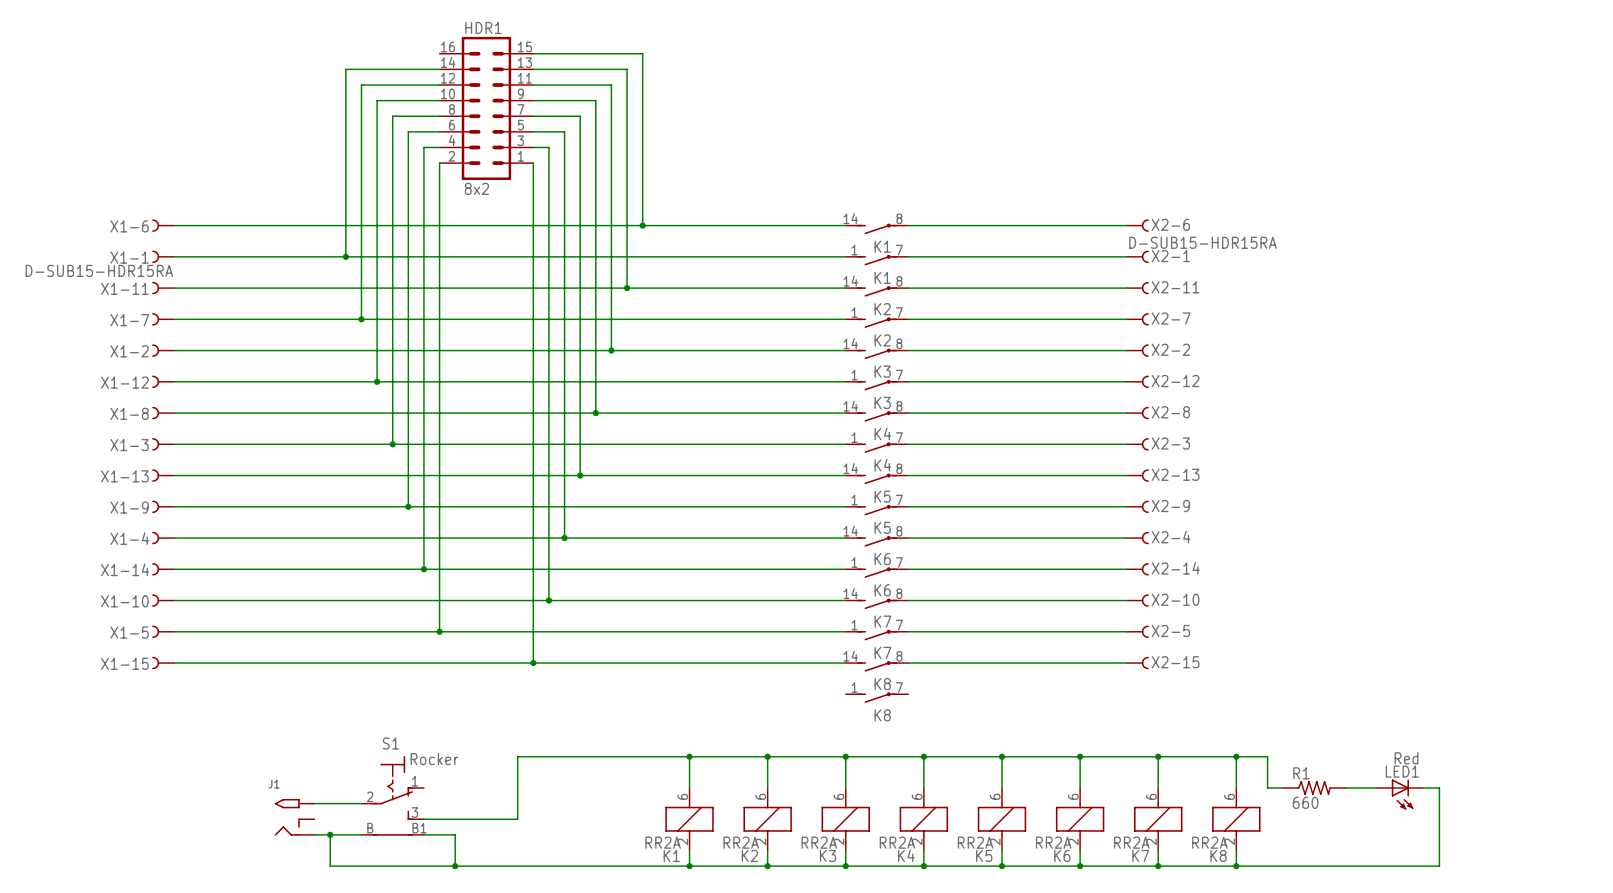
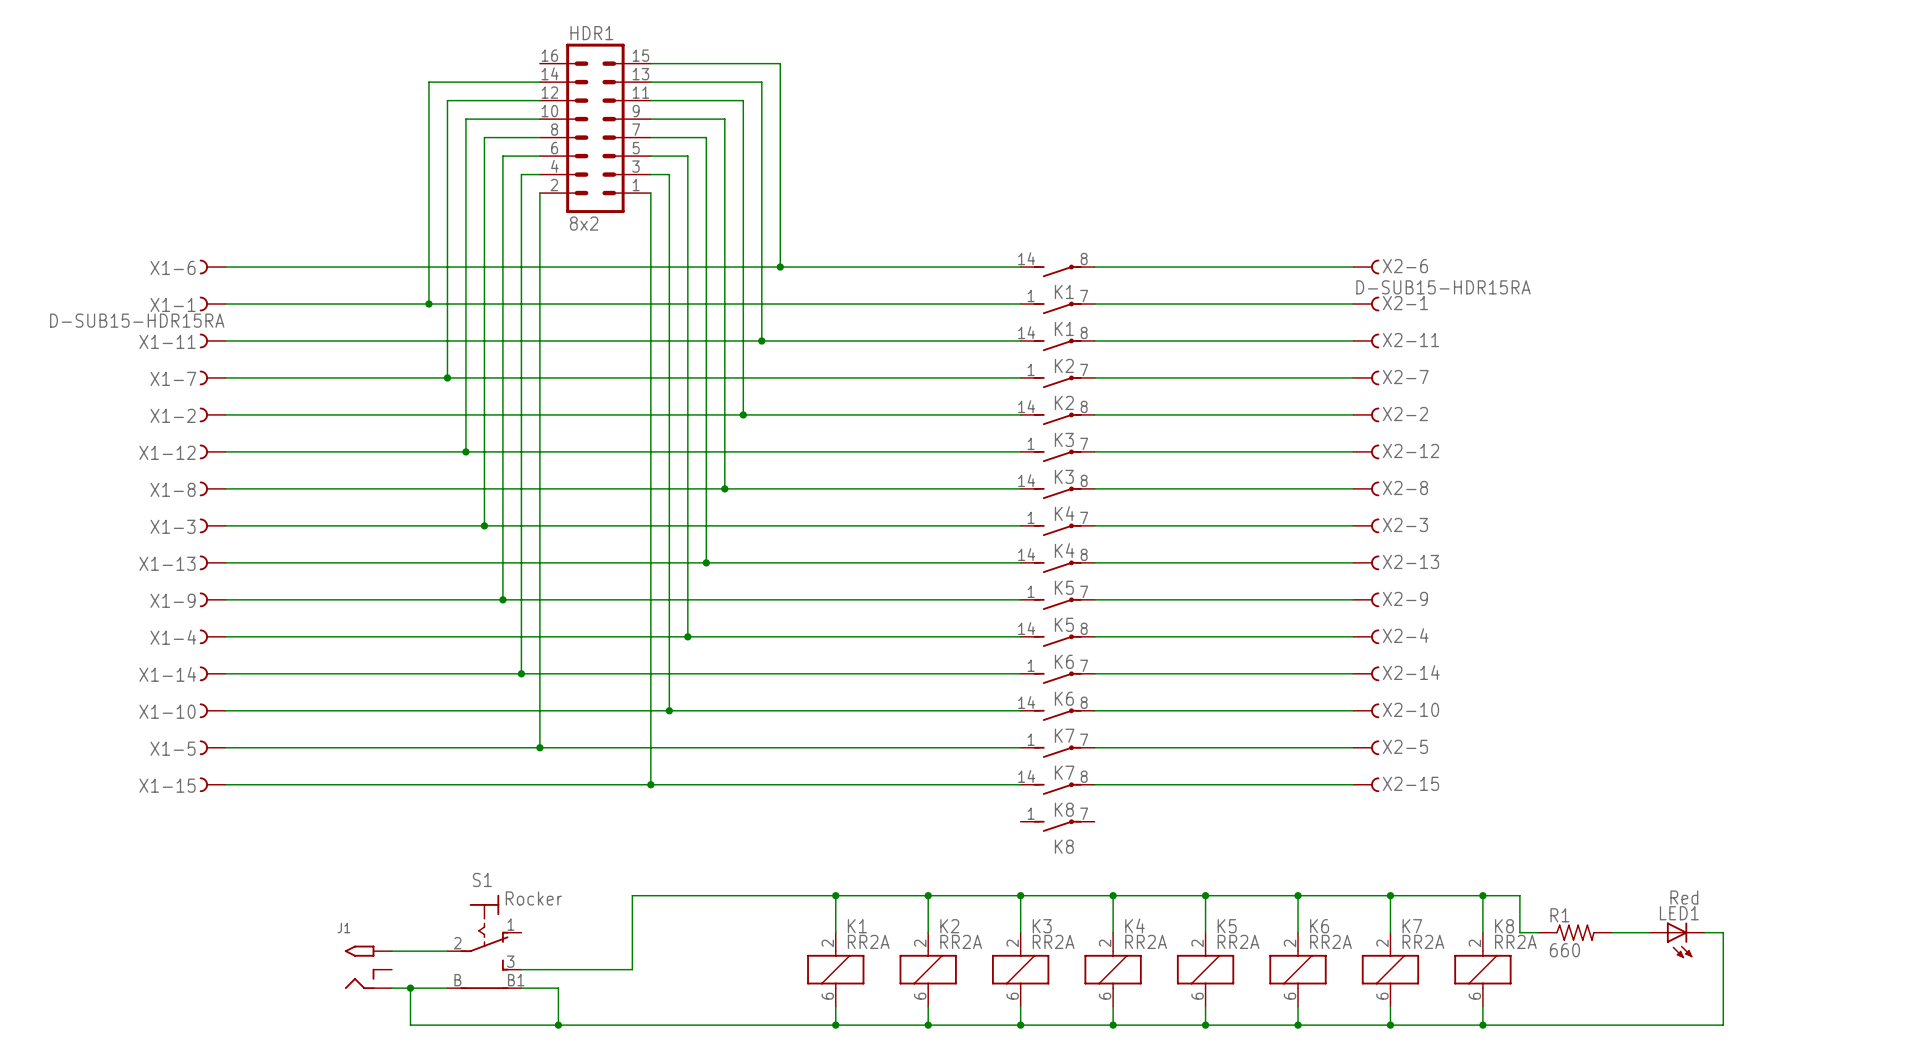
K1 rotation: 0° (689, 819) -> 180° (835, 969)
K2 rotation: 0° (767, 819) -> 180° (928, 969)
K3 rotation: 0° (845, 819) -> 180° (1020, 969)
K4 rotation: 0° (923, 819) -> 180° (1113, 969)
K5 rotation: 0° (1001, 819) -> 180° (1205, 969)
K6 rotation: 0° (1080, 819) -> 180° (1298, 969)
K7 rotation: 0° (1158, 819) -> 180° (1390, 969)
K8 rotation: 0° (1236, 819) -> 180° (1482, 969)

